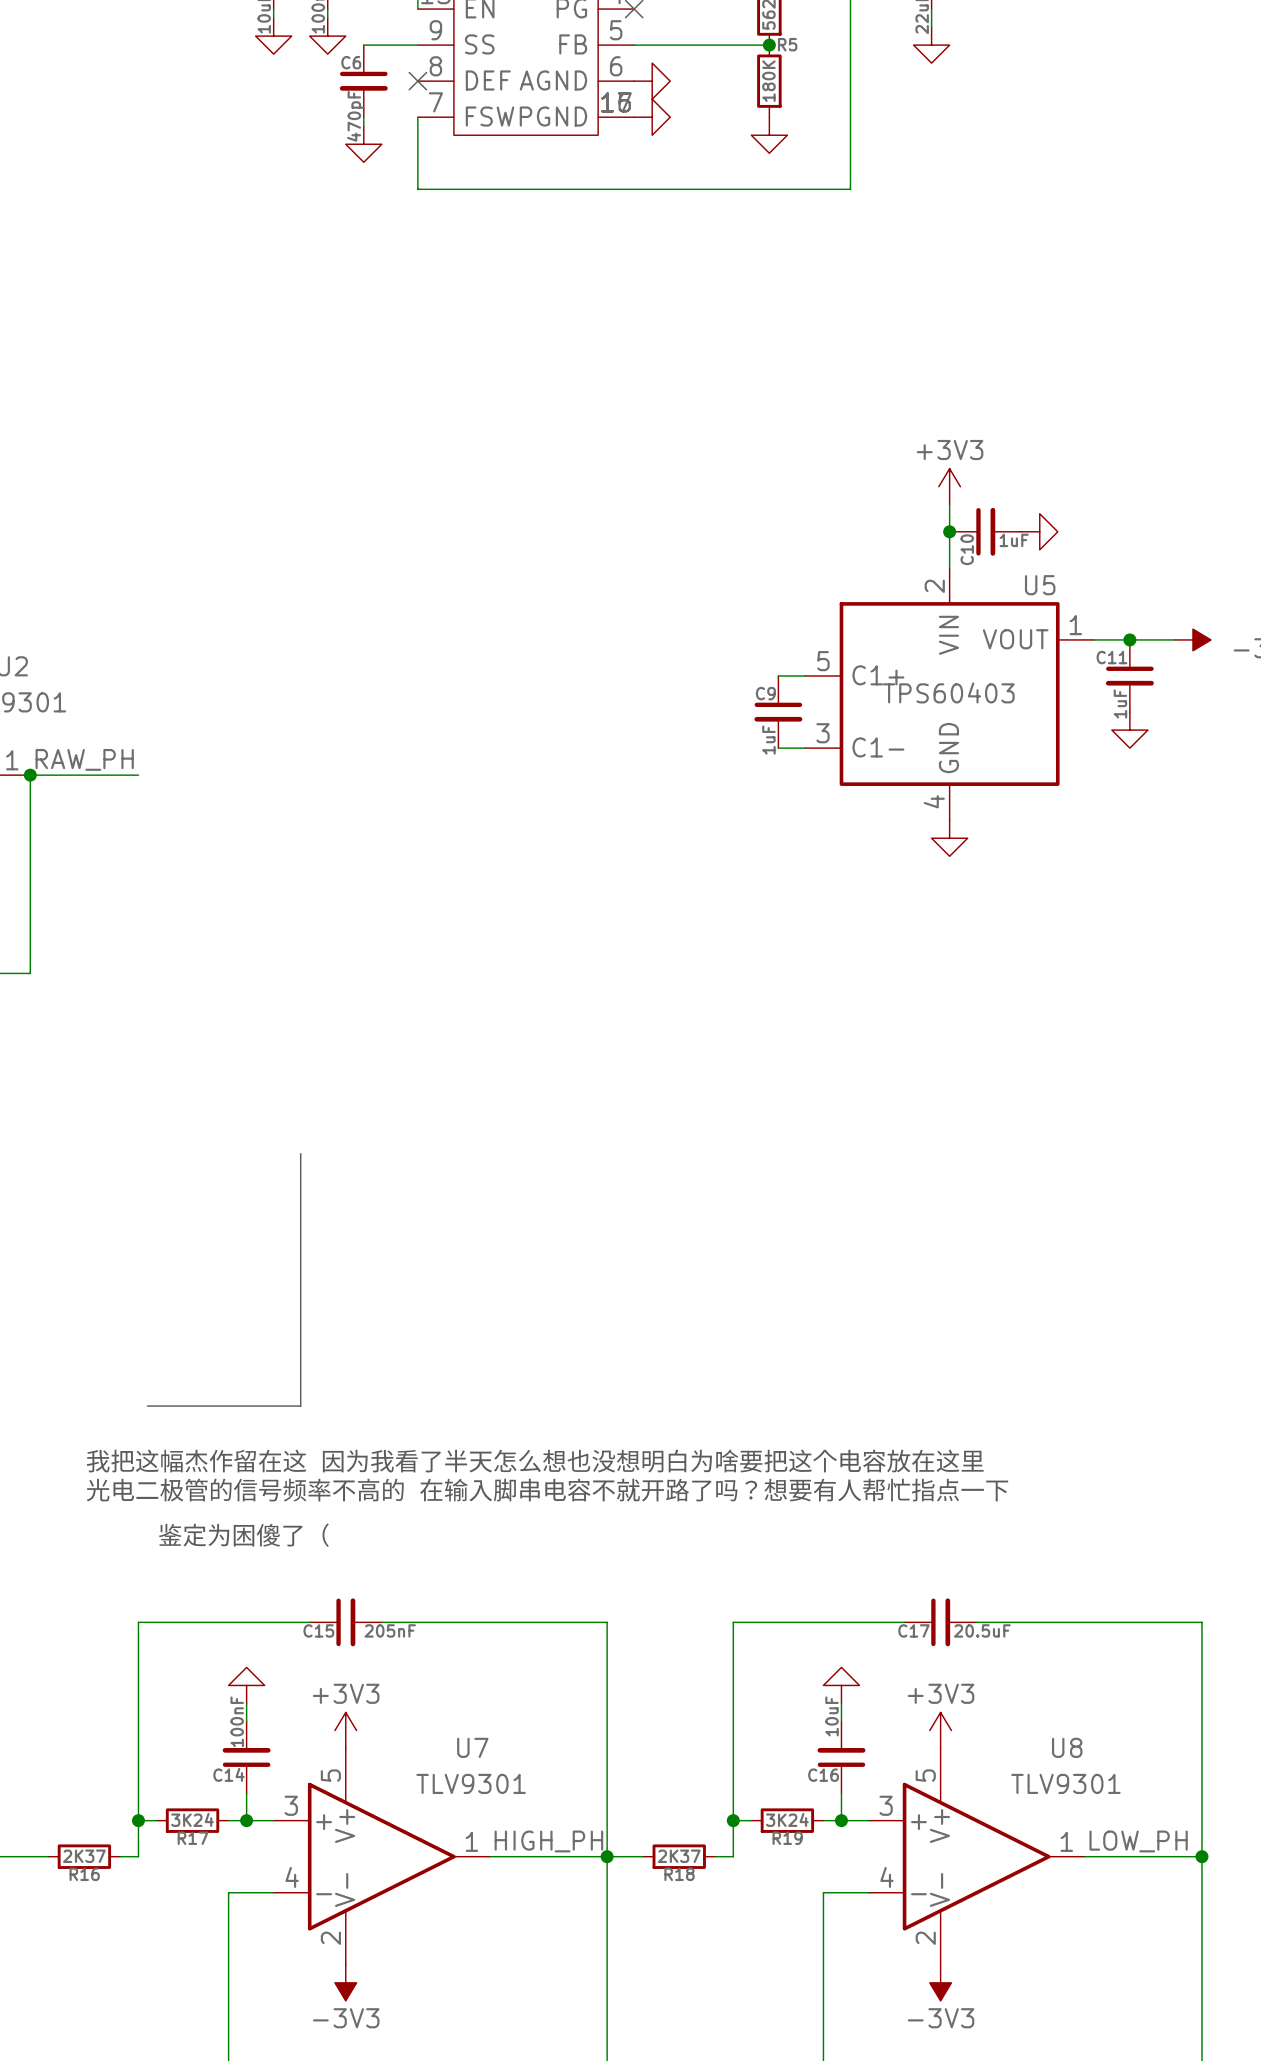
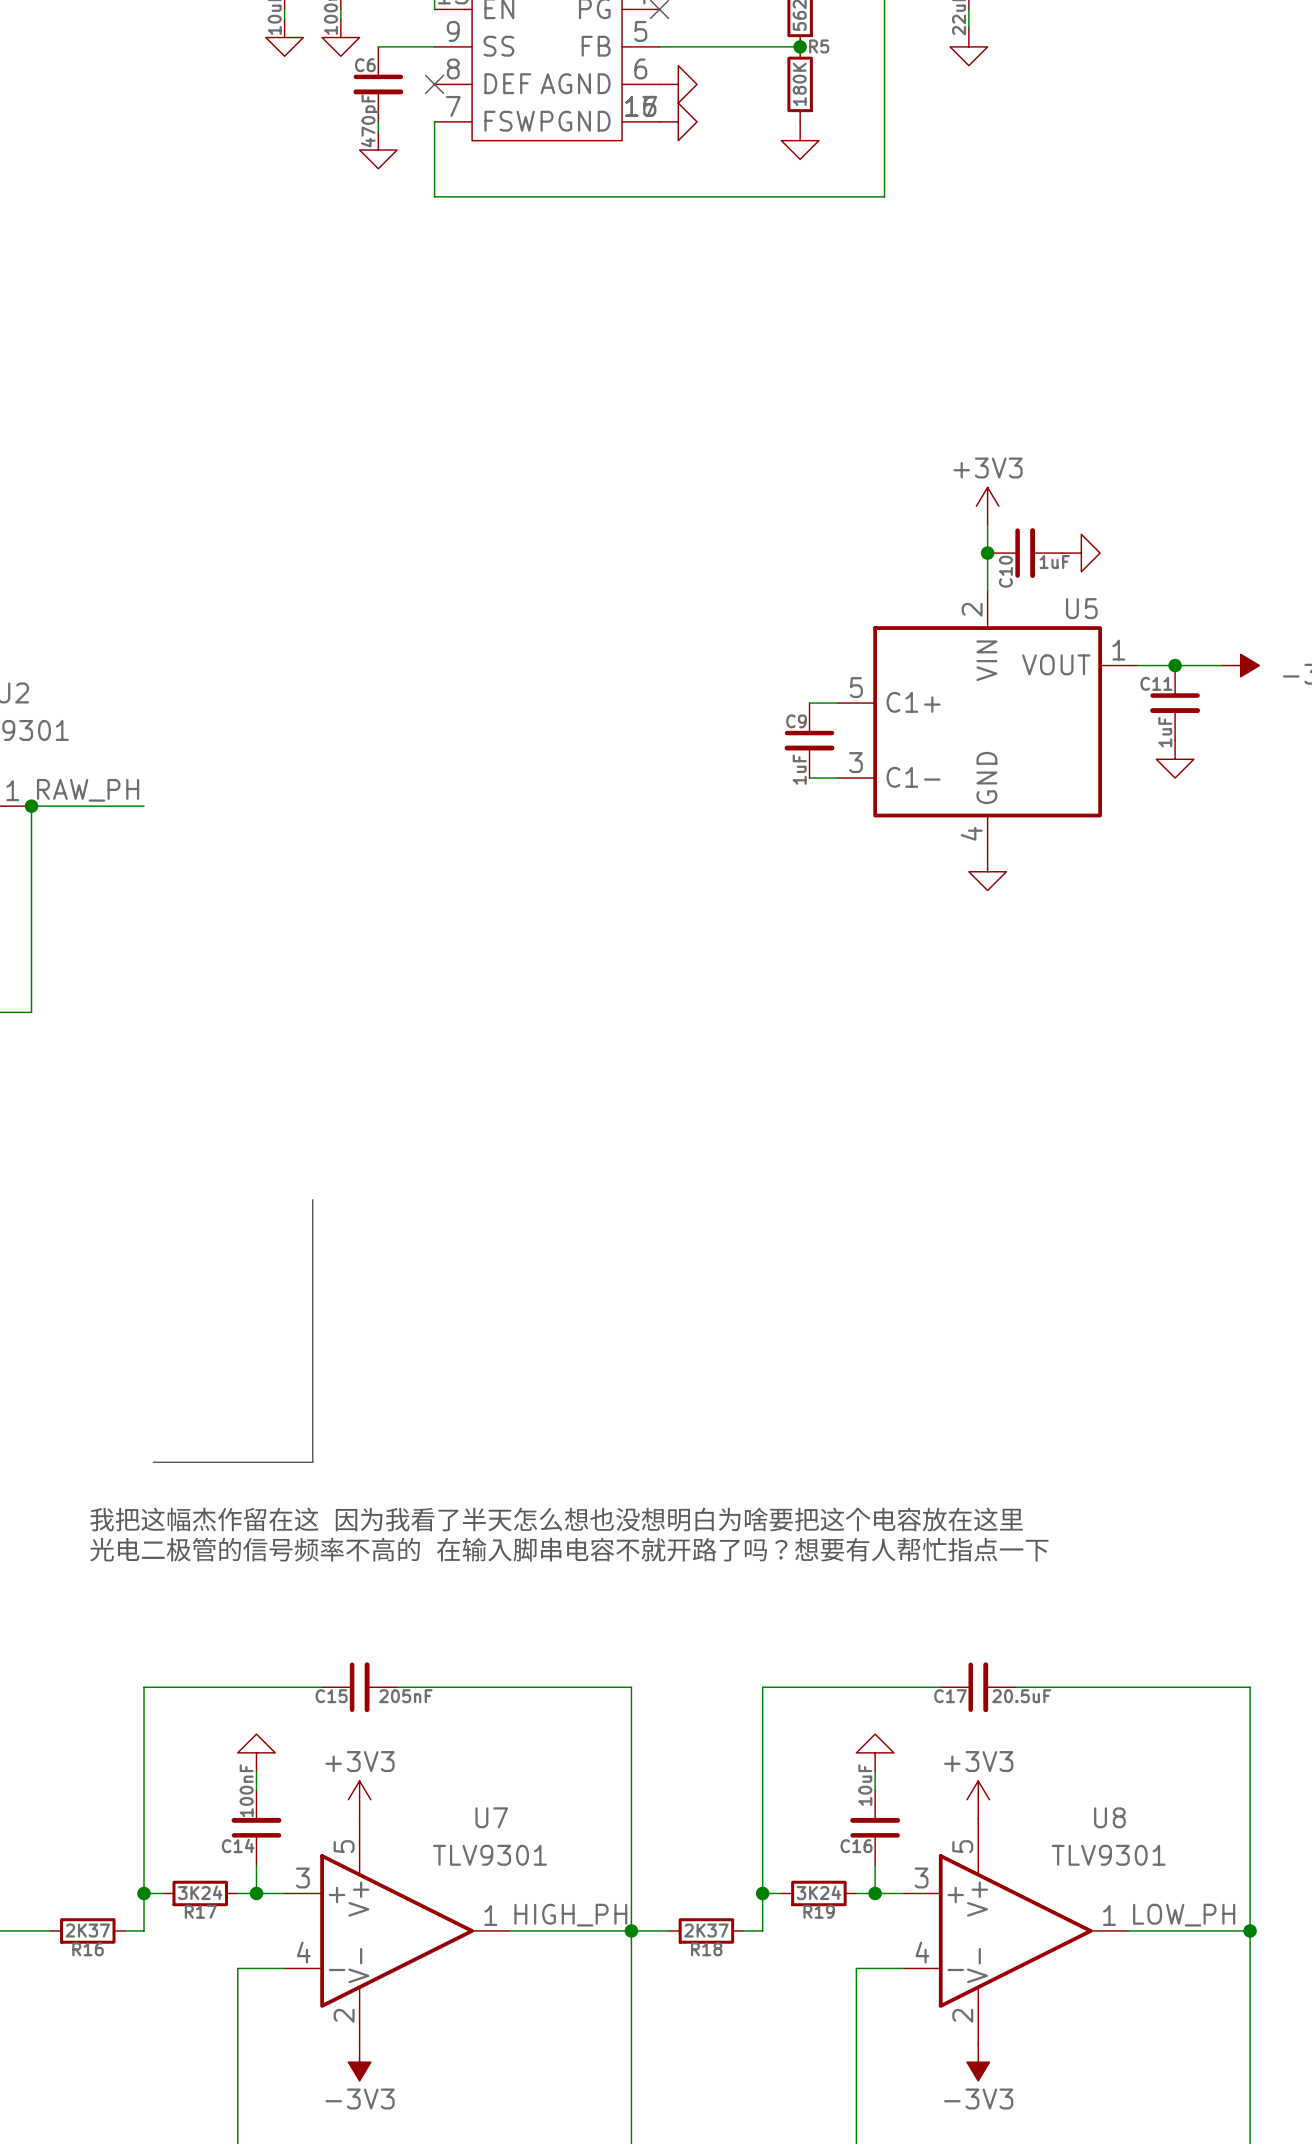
U5 value: TPS60403 (948, 692) -> none
text: 鉴定为困傻了（ (243, 1535) -> none

